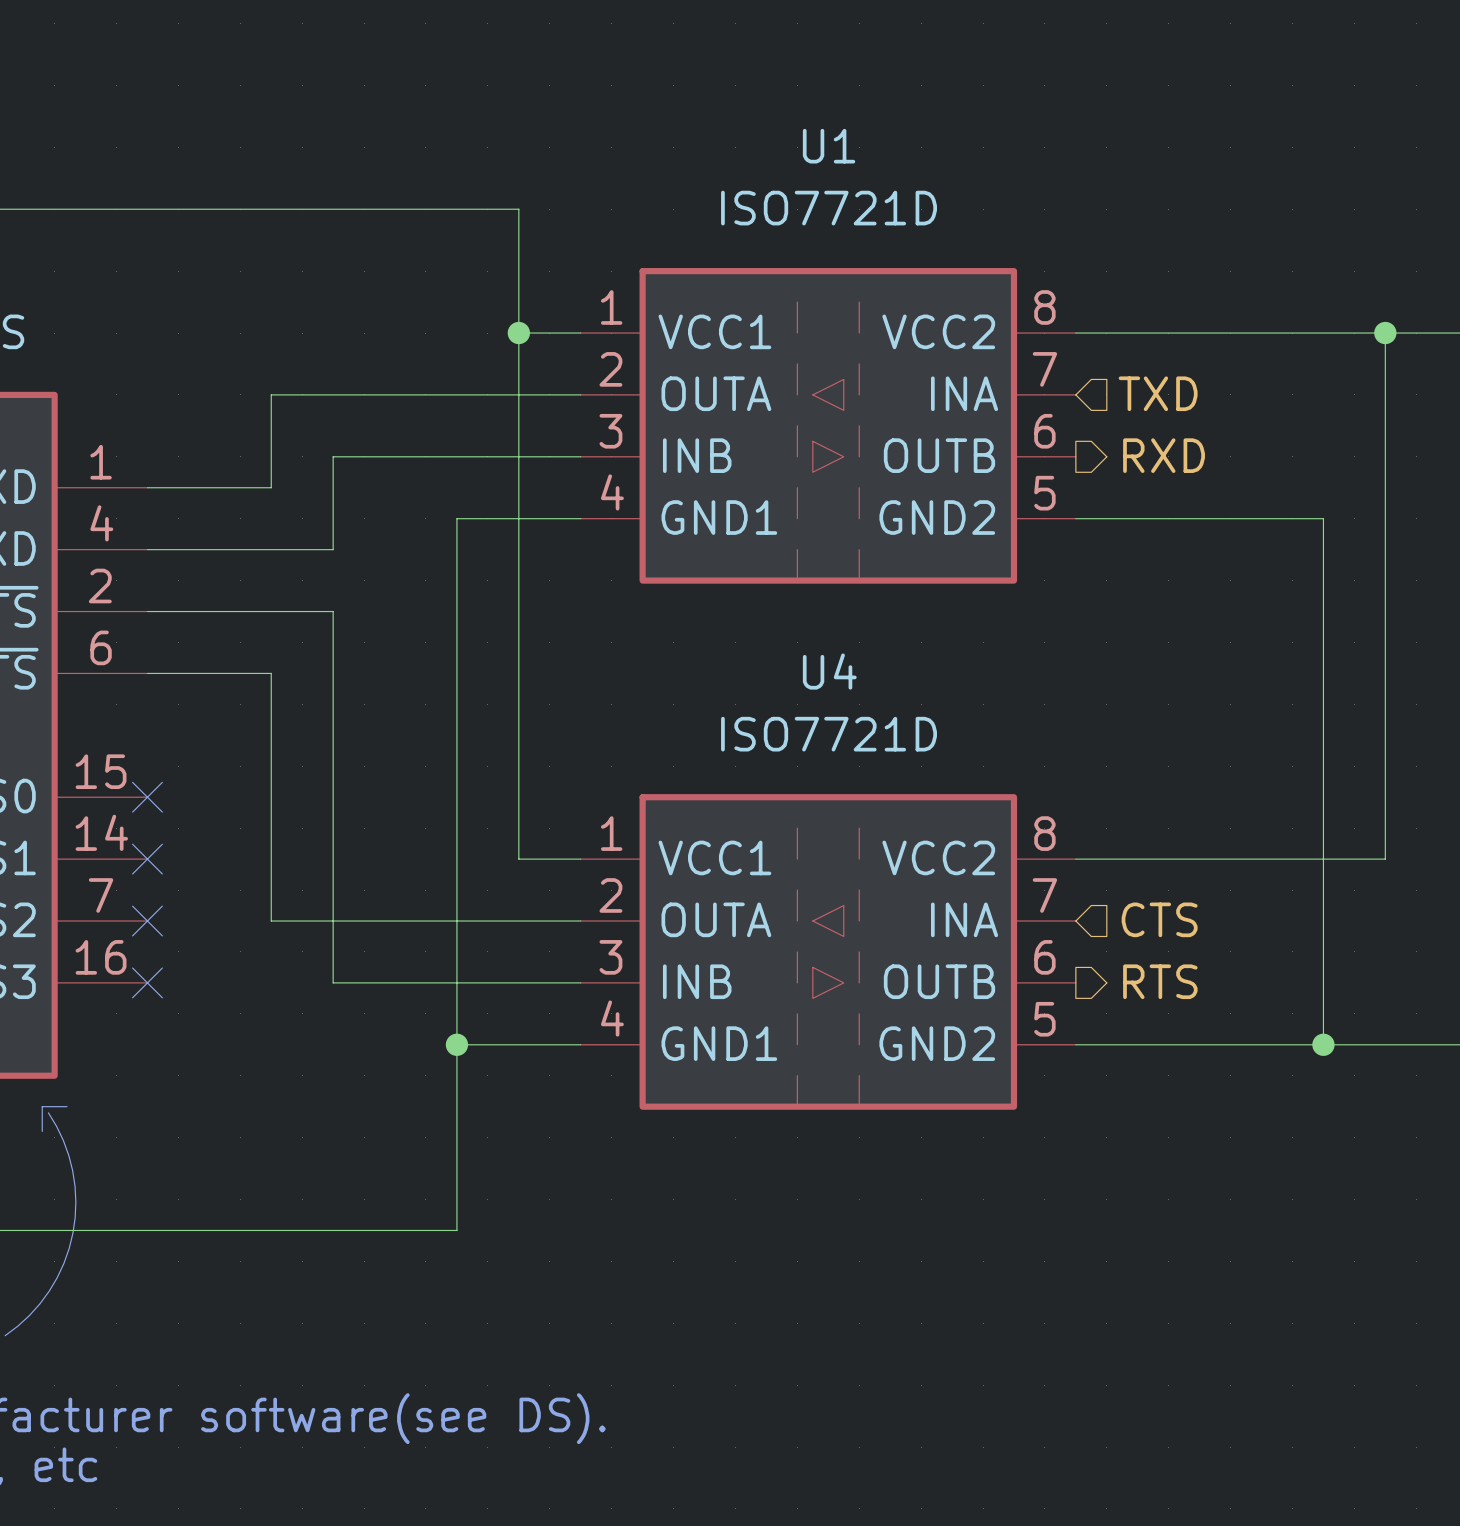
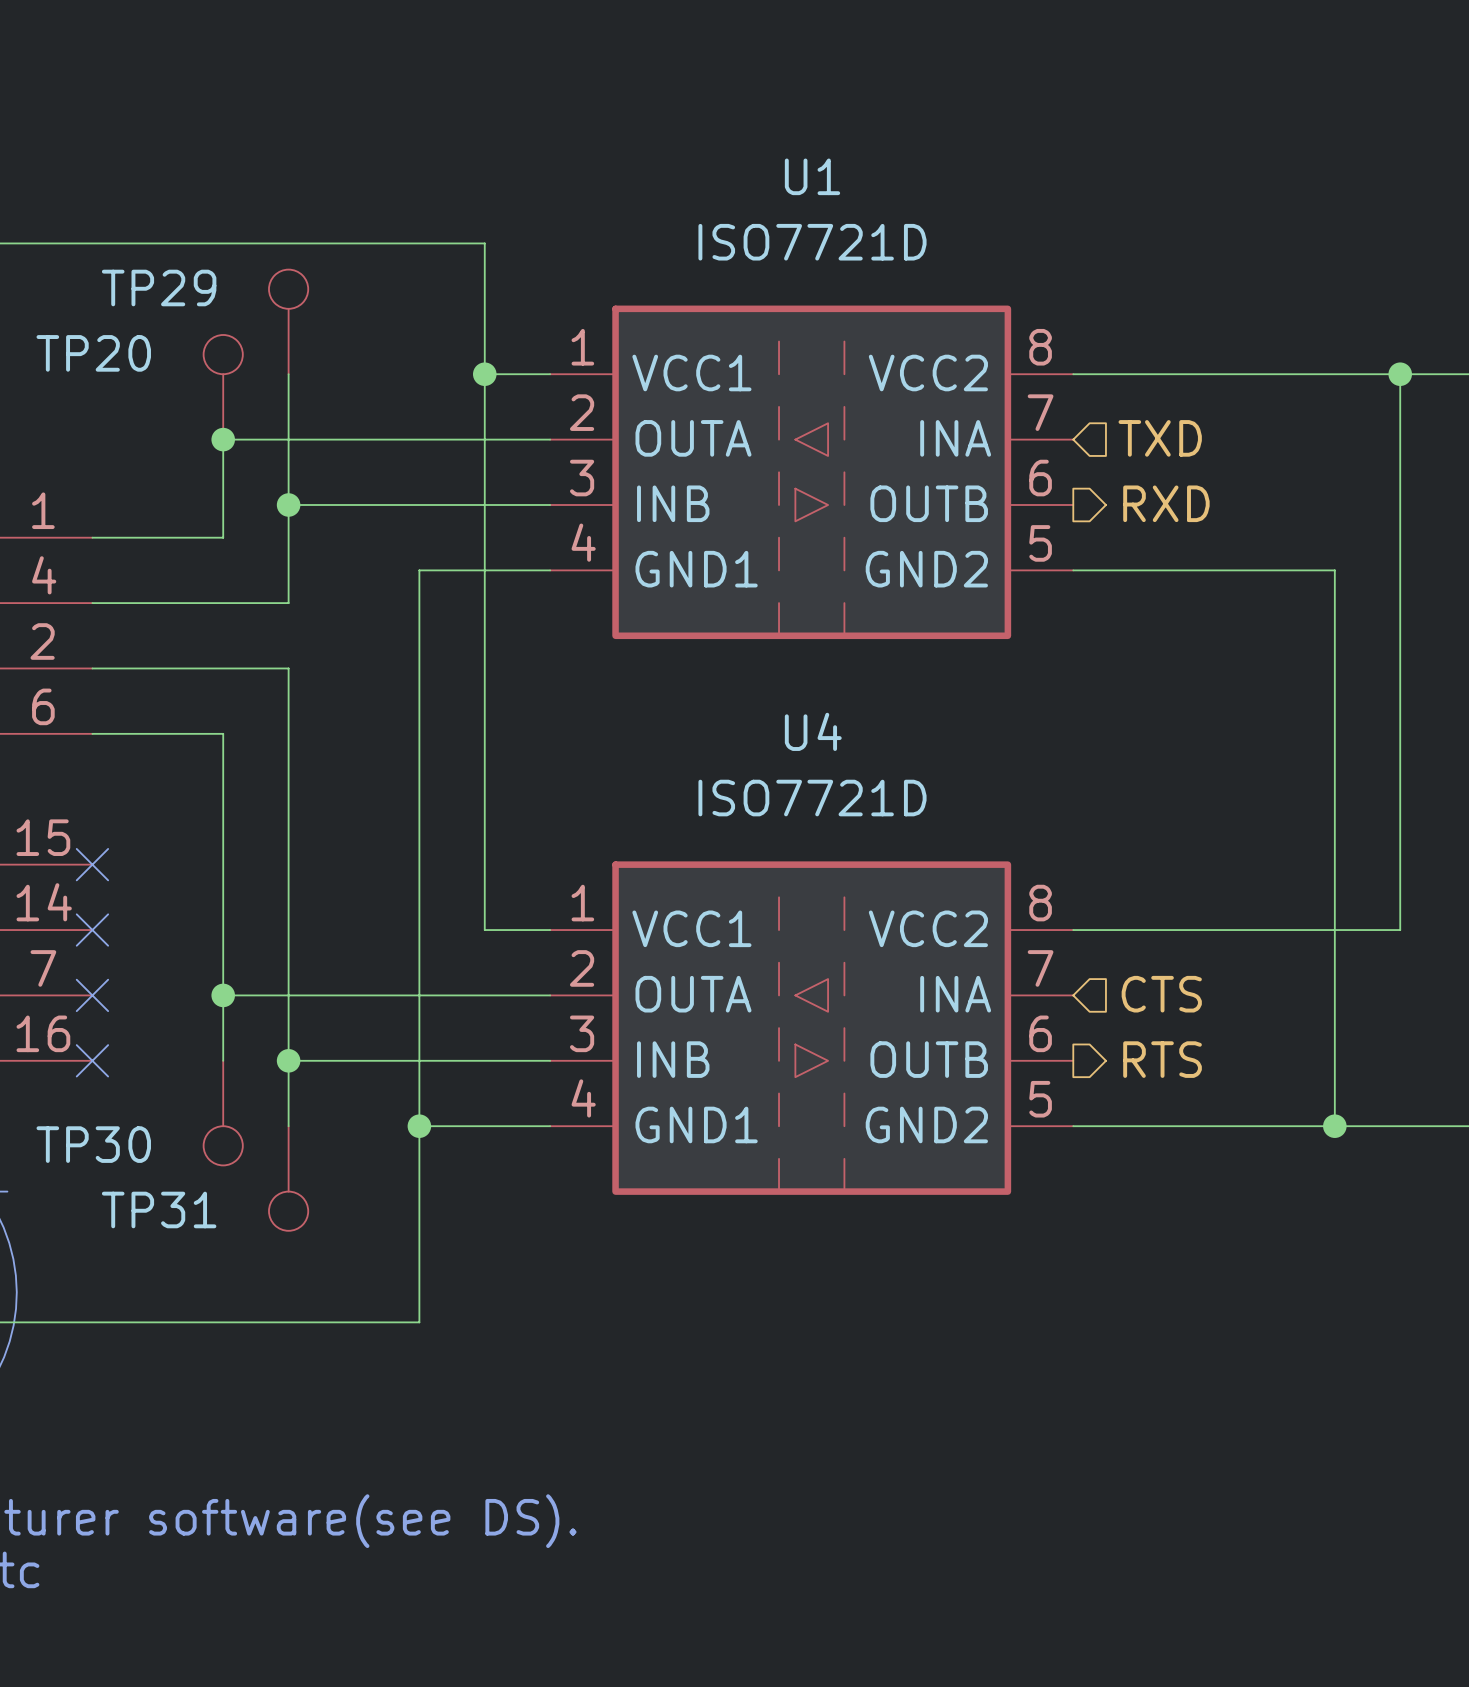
TP29: none -> (288, 321)
wire: none -> (288, 374) (288, 505)
TP20: none -> (223, 387)
junction: none -> (223, 439)
junction: none -> (288, 505)
wire: none -> (223, 995) (223, 1060)
junction: none -> (223, 995)
wire: none -> (288, 1060) (288, 1126)
junction: none -> (288, 1060)
TP30: none -> (223, 1113)
TP31: none -> (288, 1178)

